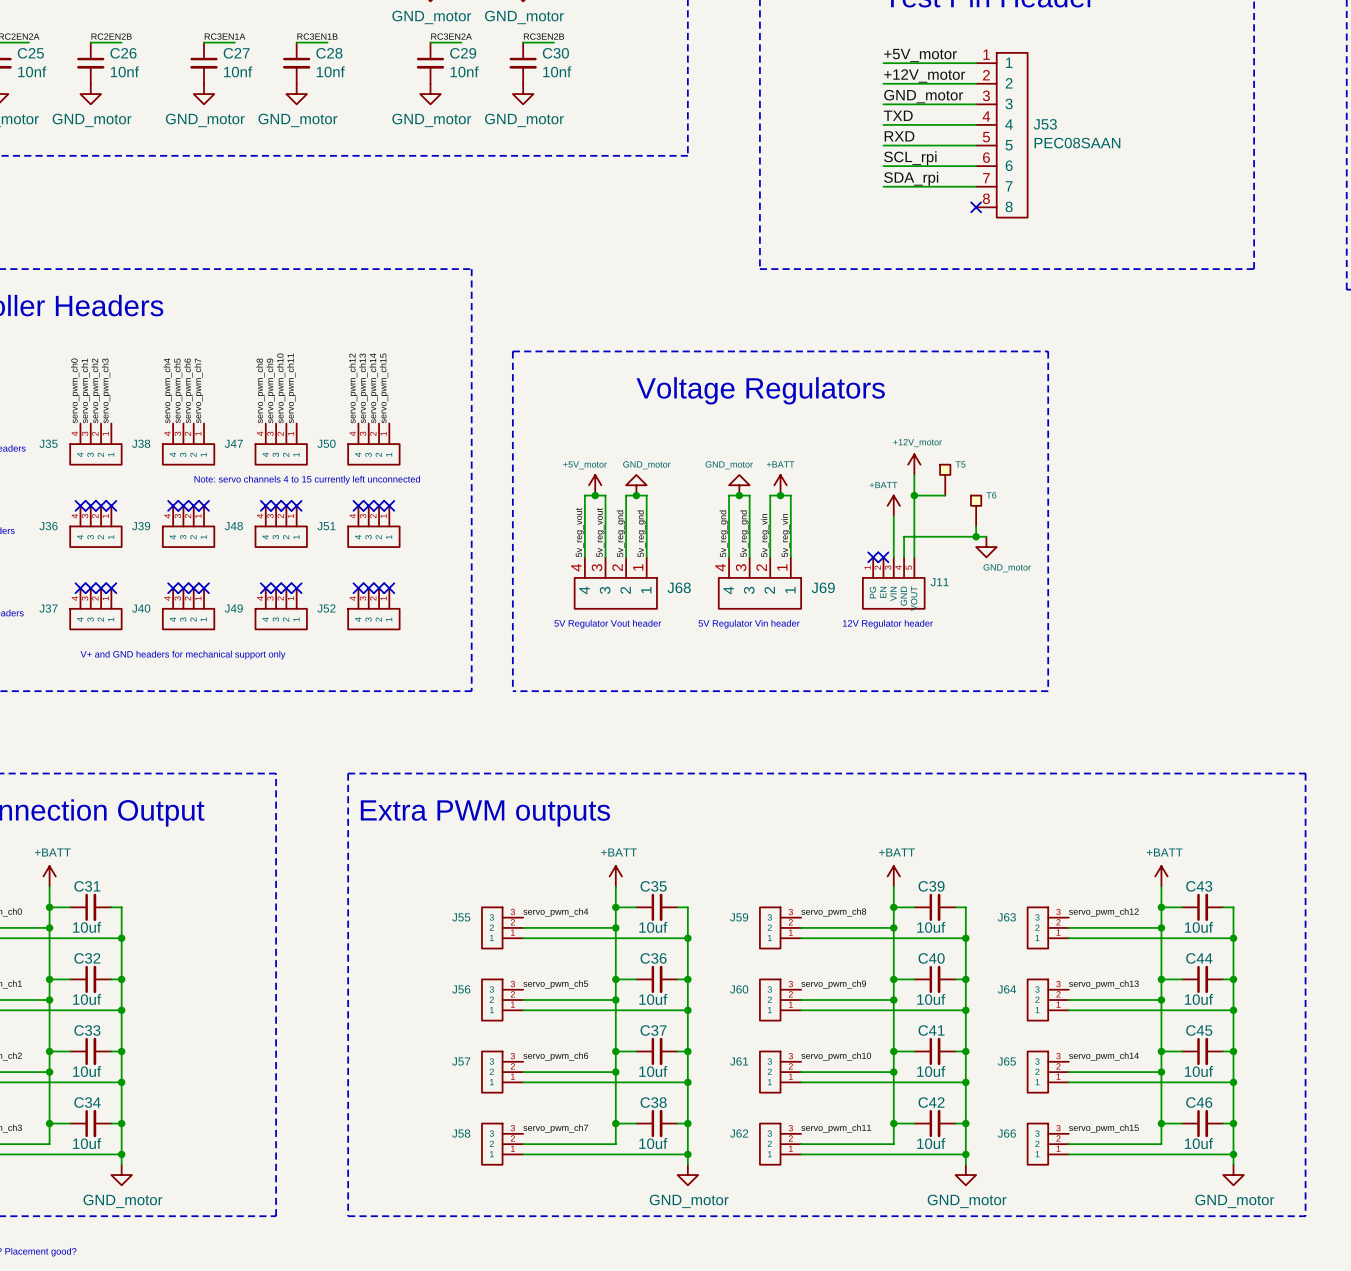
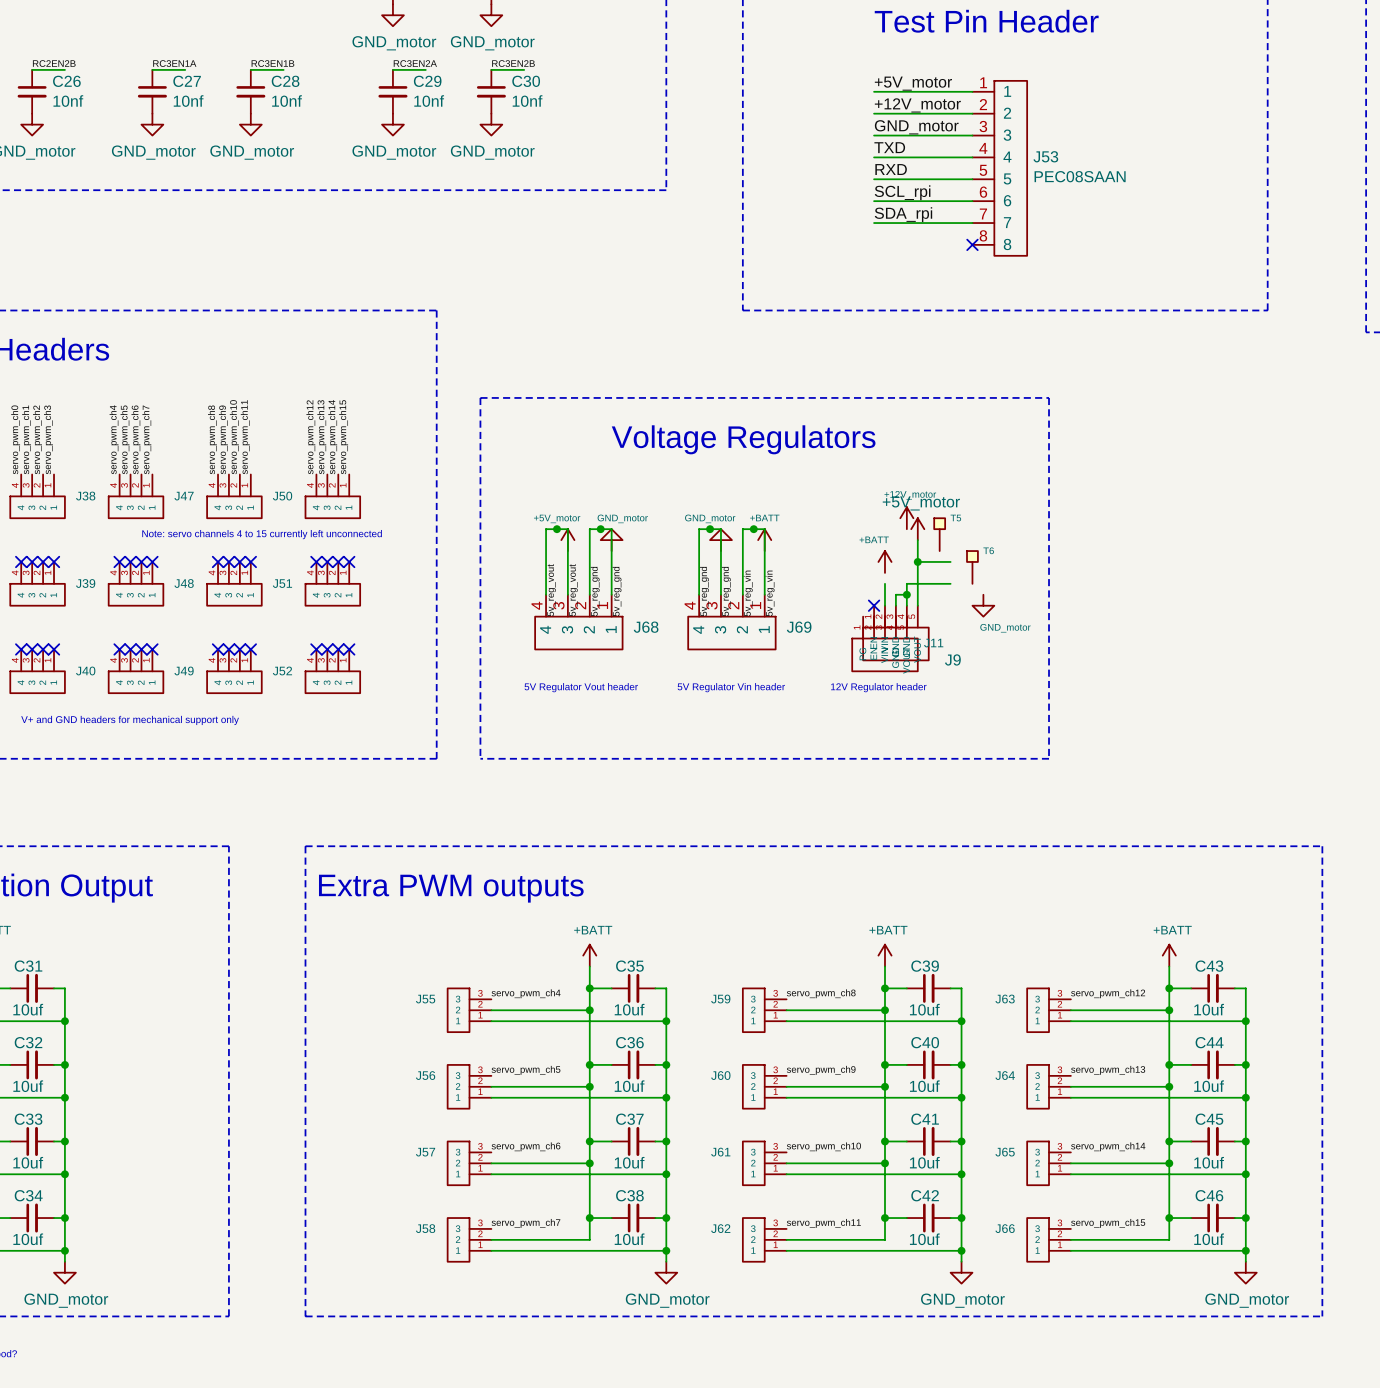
junction: none -> (556, 529)
junction: none -> (600, 529)
junction: none -> (710, 529)
junction: none -> (753, 529)
wire: (914, 474) (914, 526) -> (950, 583) (906, 583)
power symbol: none -> +5V_motor (917, 529)
wire: none -> (917, 540) (917, 605)
junction: (595, 495) -> none
junction: (636, 495) -> none
junction: (739, 495) -> none
junction: (780, 495) -> none
wire: (914, 495) (945, 495) -> (917, 561) (950, 561)
junction position: (914, 495) -> (917, 561)
wire: (893, 516) (893, 526) -> none
wire: (976, 526) (976, 536) -> none
wire: (914, 536) (986, 536) -> none
junction: none -> (906, 594)
junction: (976, 536) -> none
no-connect mark: none -> (874, 605)
wire: (584, 557) (584, 495) (605, 495) (605, 557) -> (546, 594) (546, 529) (567, 529) (567, 594)
wire: (626, 557) (626, 495) (646, 495) (646, 557) -> (589, 594) (589, 529) (611, 529) (611, 594)
wire: (729, 557) (729, 495) (749, 495) (749, 557) -> (699, 594) (699, 529) (720, 529) (720, 594)
wire: (770, 557) (770, 495) (790, 495) (790, 557) -> (742, 594) (742, 529) (764, 529) (764, 594)
no-connect mark: (873, 557) -> none
no-connect mark: (883, 557) -> none
J9: none -> (895, 633)
J68 position: (615, 583) -> (578, 622)
J69 position: (759, 583) -> (731, 622)

